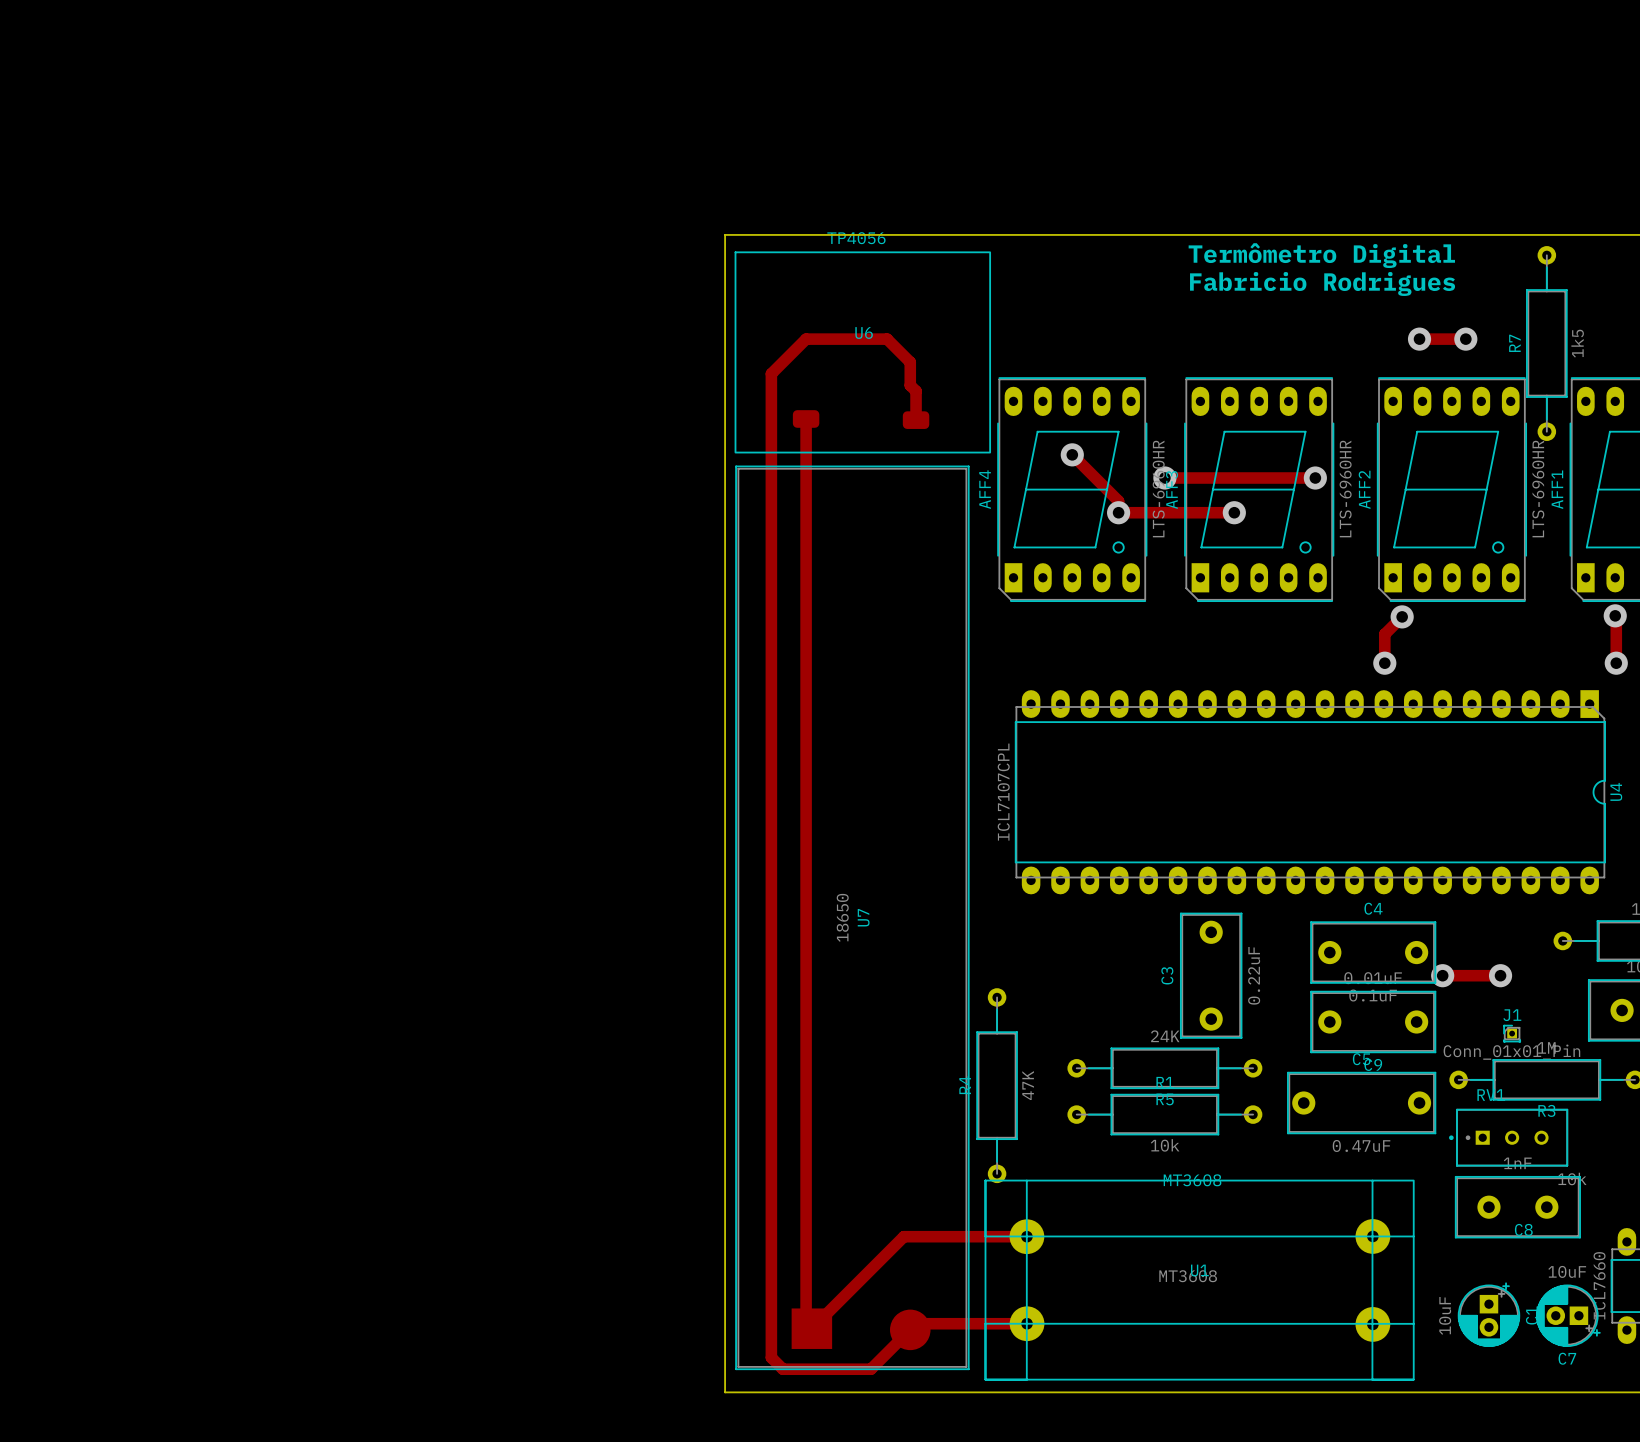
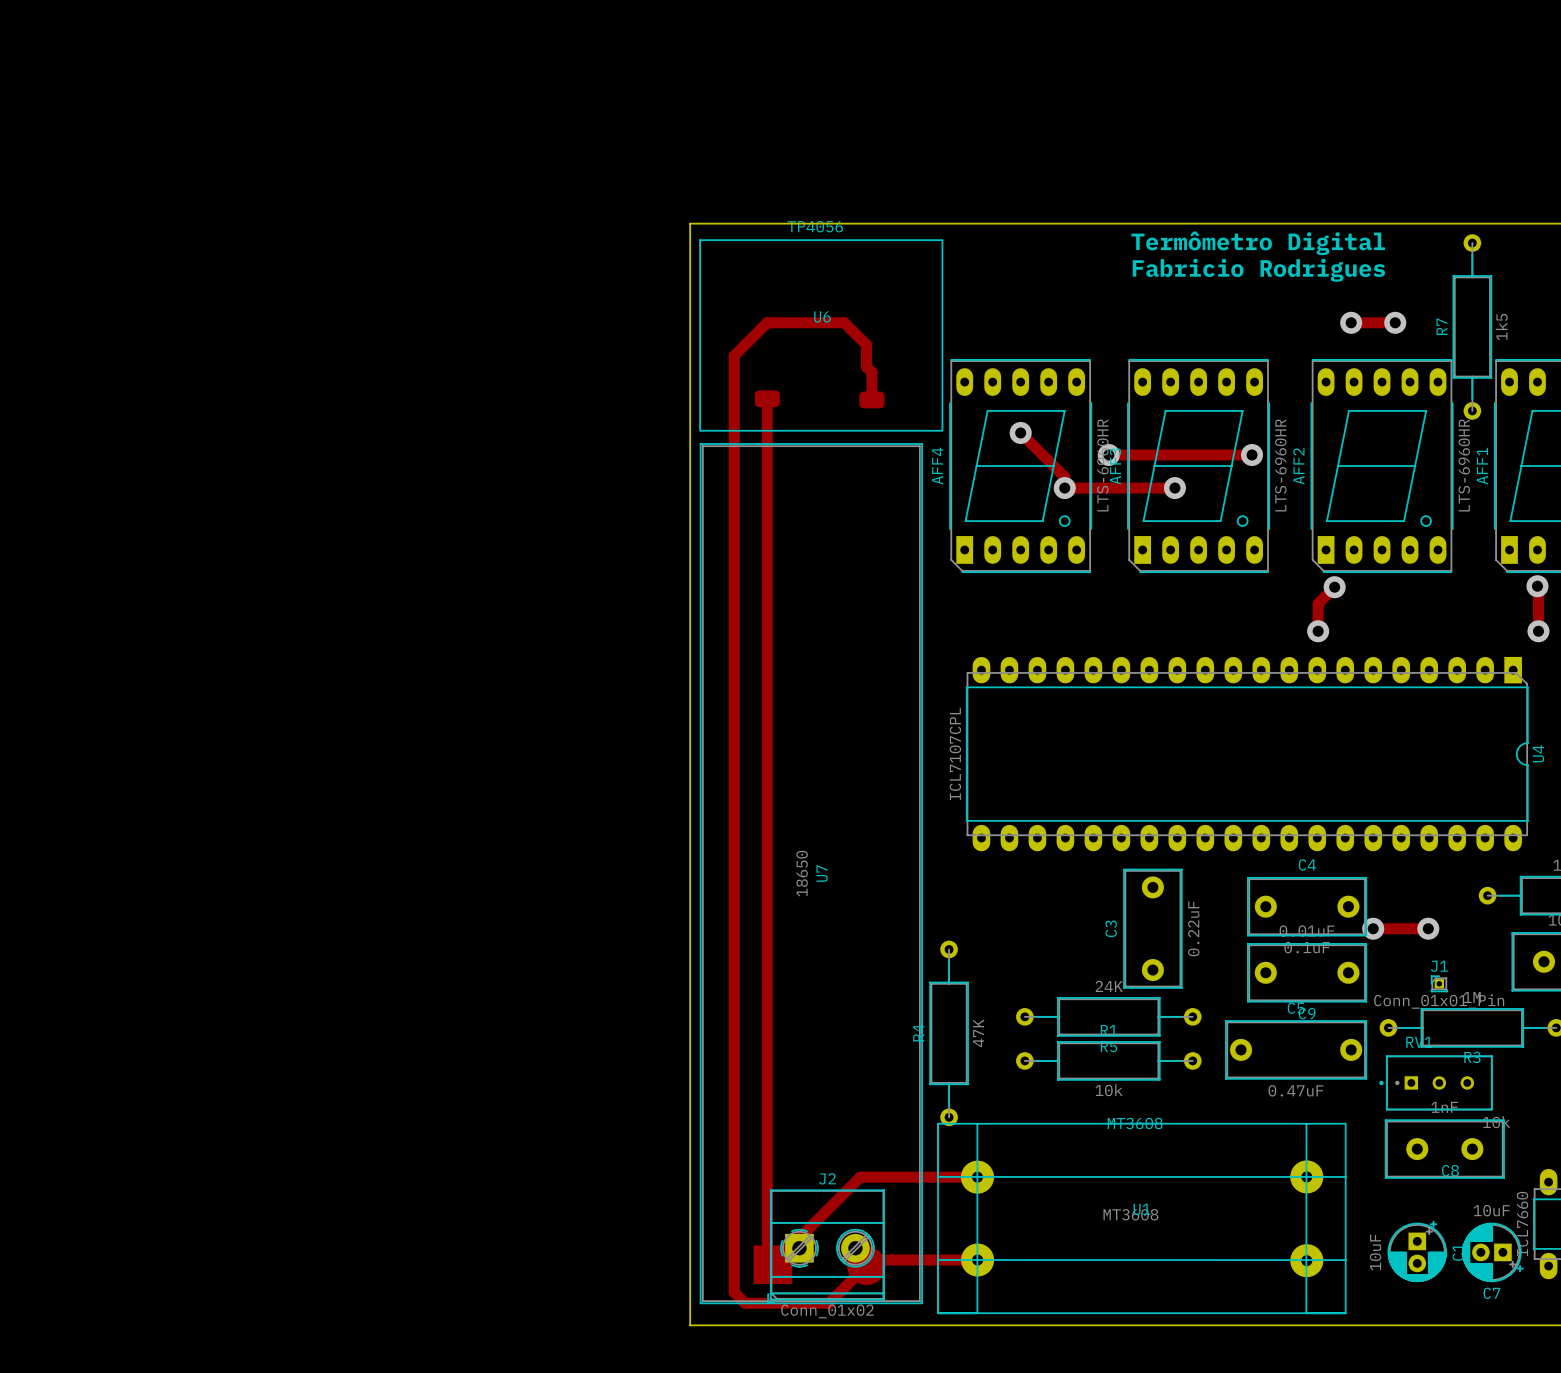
J2: none -> Conn_01x02 (826, 1246)

